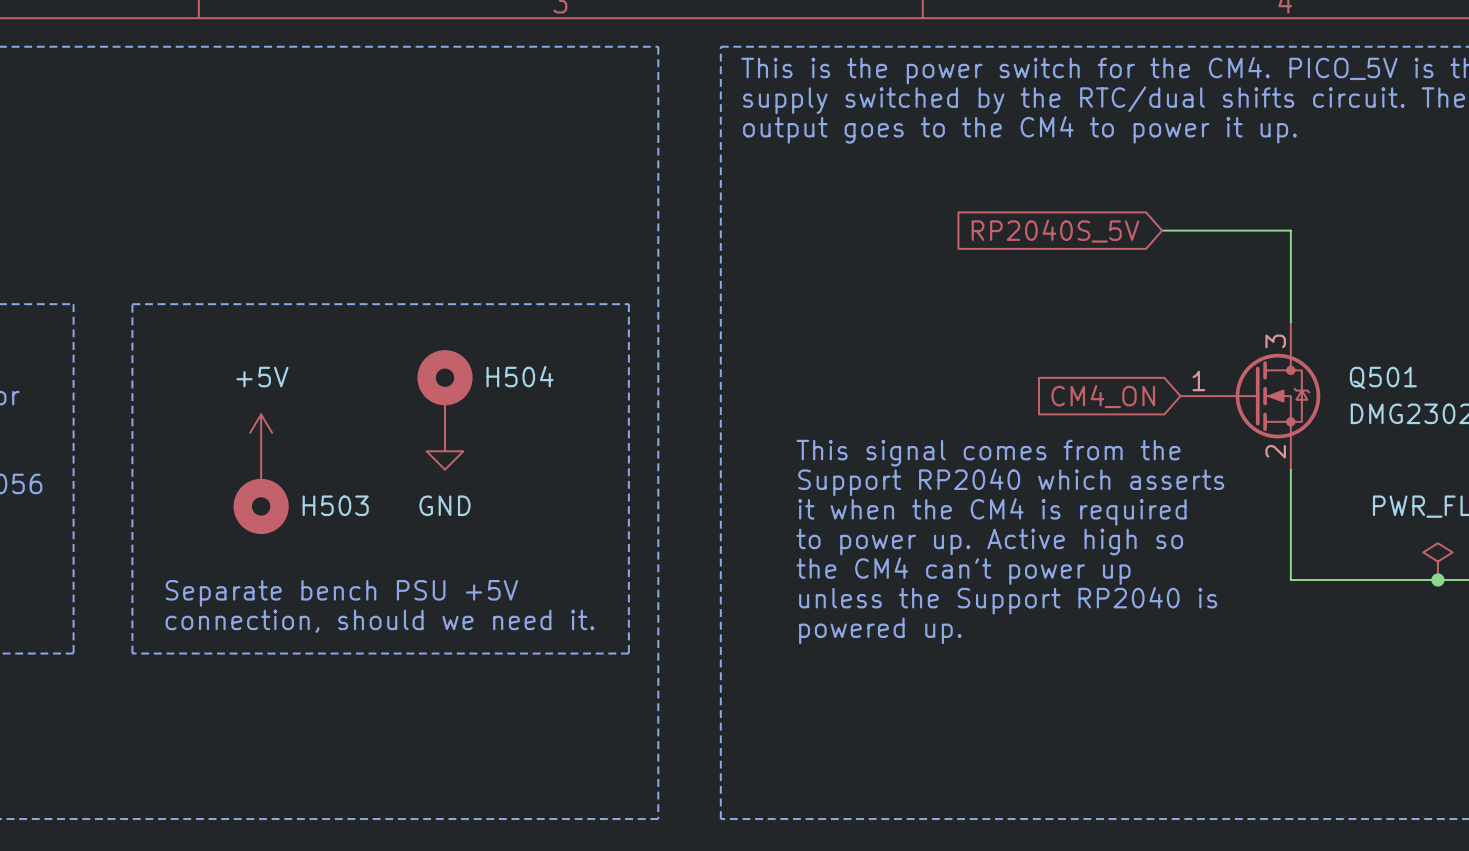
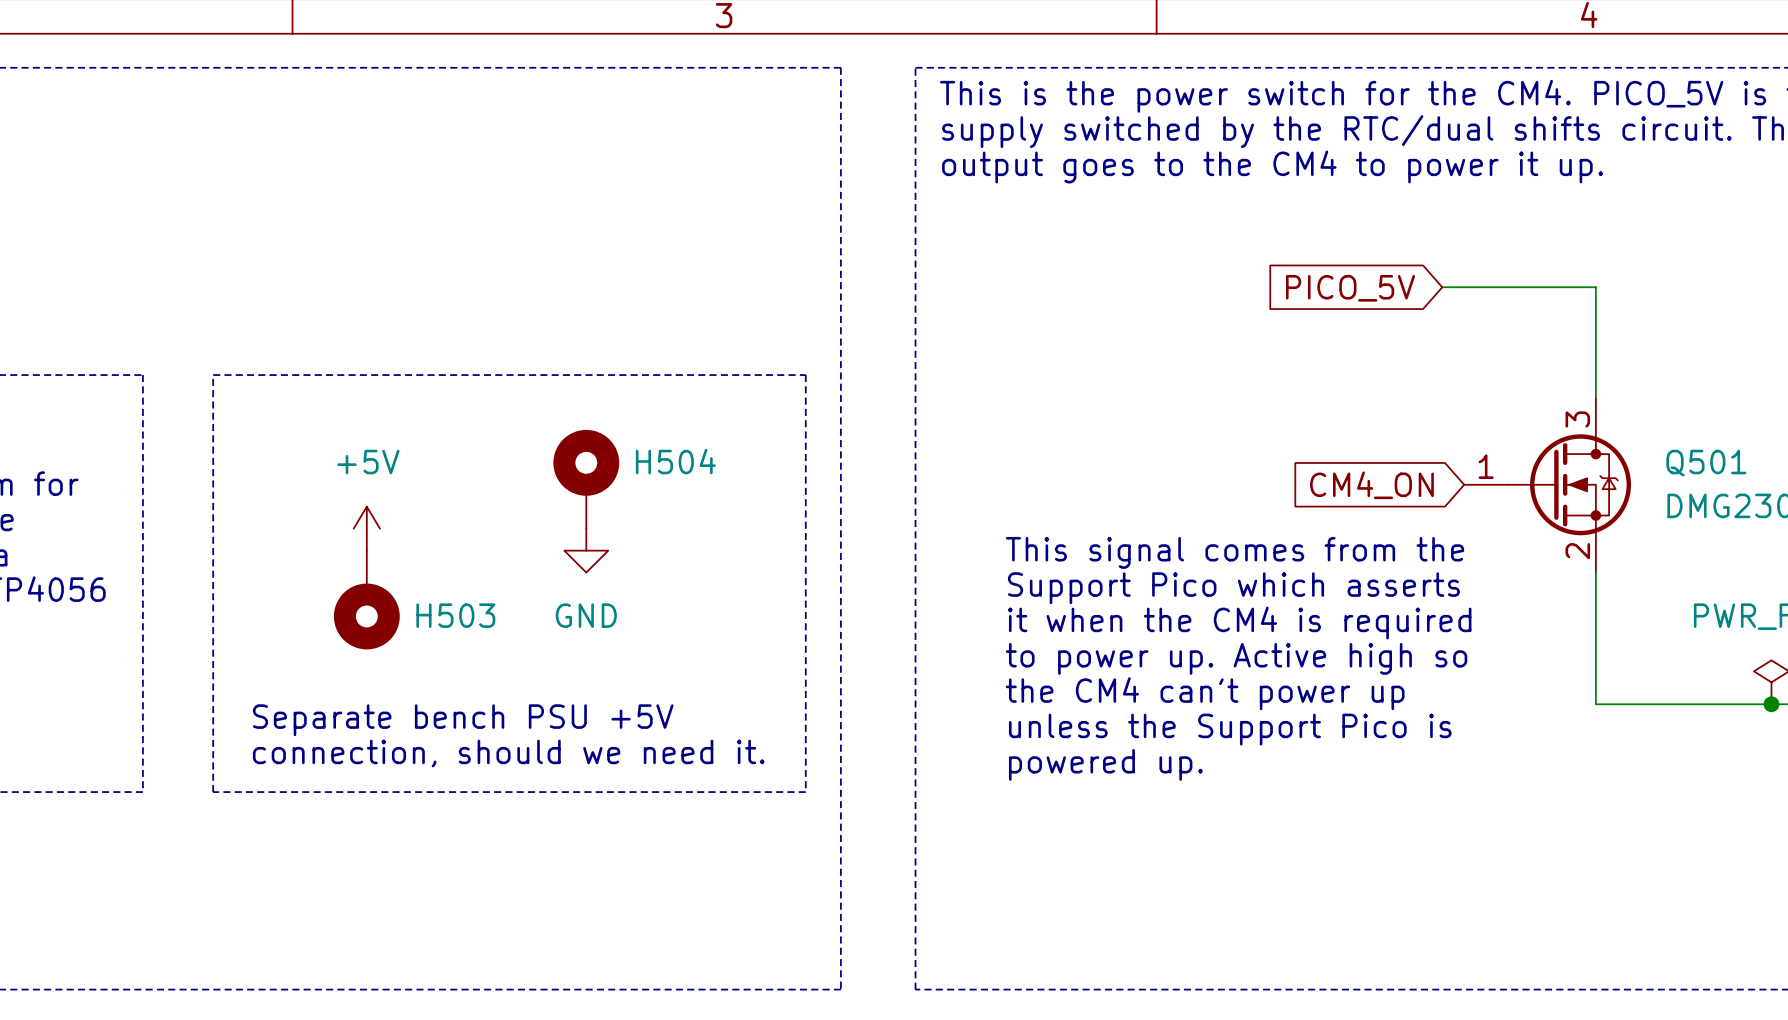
global label: RP2040S_5V (1055, 231) -> PICO_5V (1350, 288)
text: Support RP2040 which asserts (1011, 482) -> Support Pico which asserts (1233, 588)
text: unless the Support RP2040 is (1008, 600) -> unless the Support Pico is (1230, 729)

